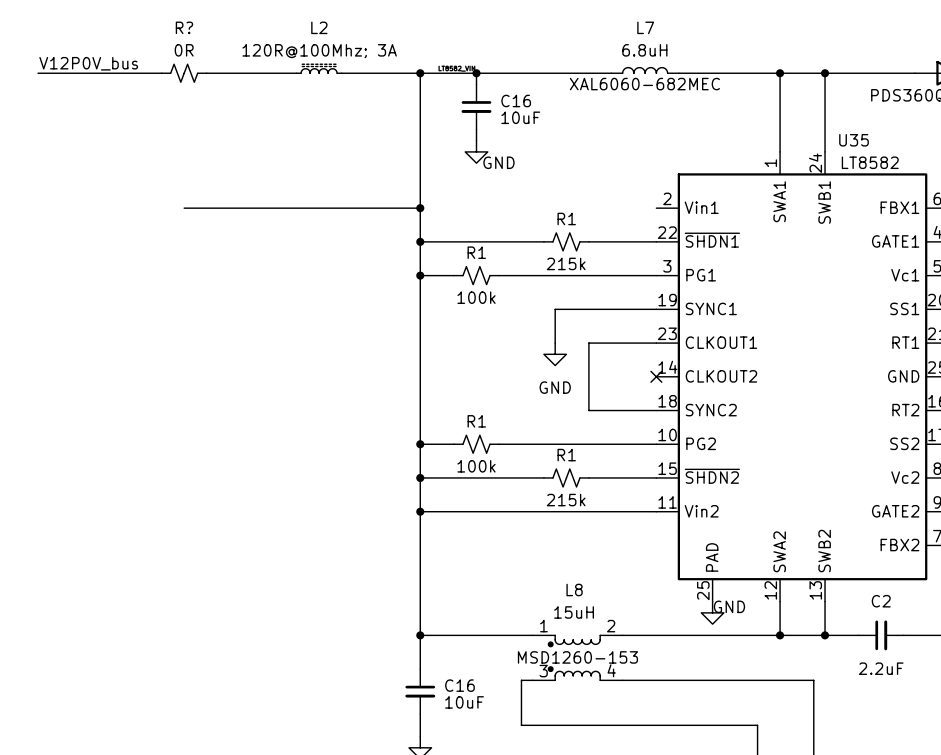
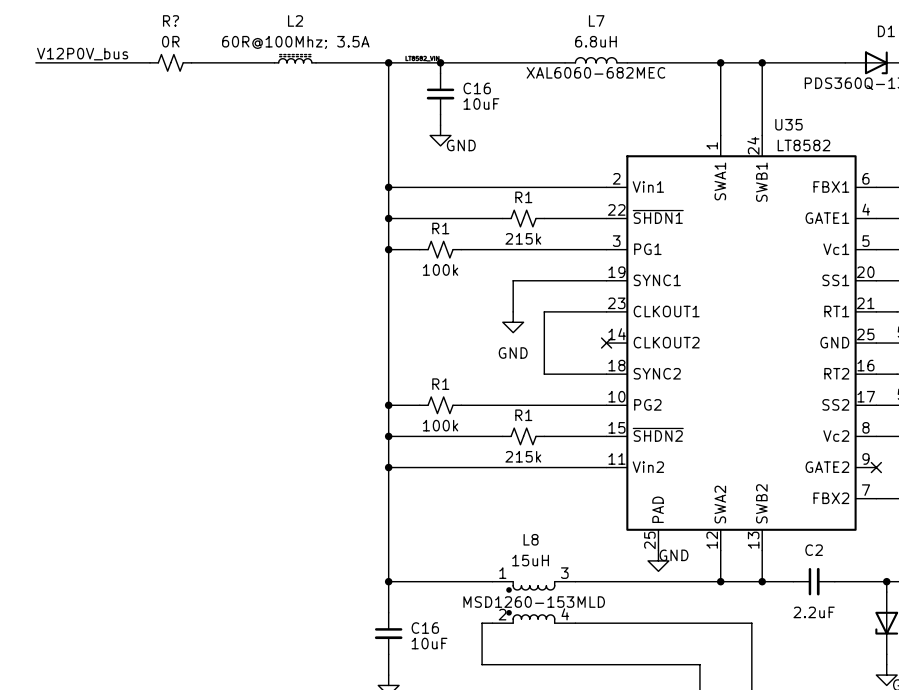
L2 value: 120R@100Mhz; 3A (319, 51) -> 60R@100Mhz; 3.5A (295, 42)
wire: (184, 208) (420, 208) -> (606, 187) (388, 187)
L8 pin number: 2 (611, 626) -> 3 (564, 573)
L8 text: MSD1260-153 (577, 657) -> MSD1260-153MLD (534, 602)
L8 pin number: 3 (543, 671) -> 2 (502, 614)

